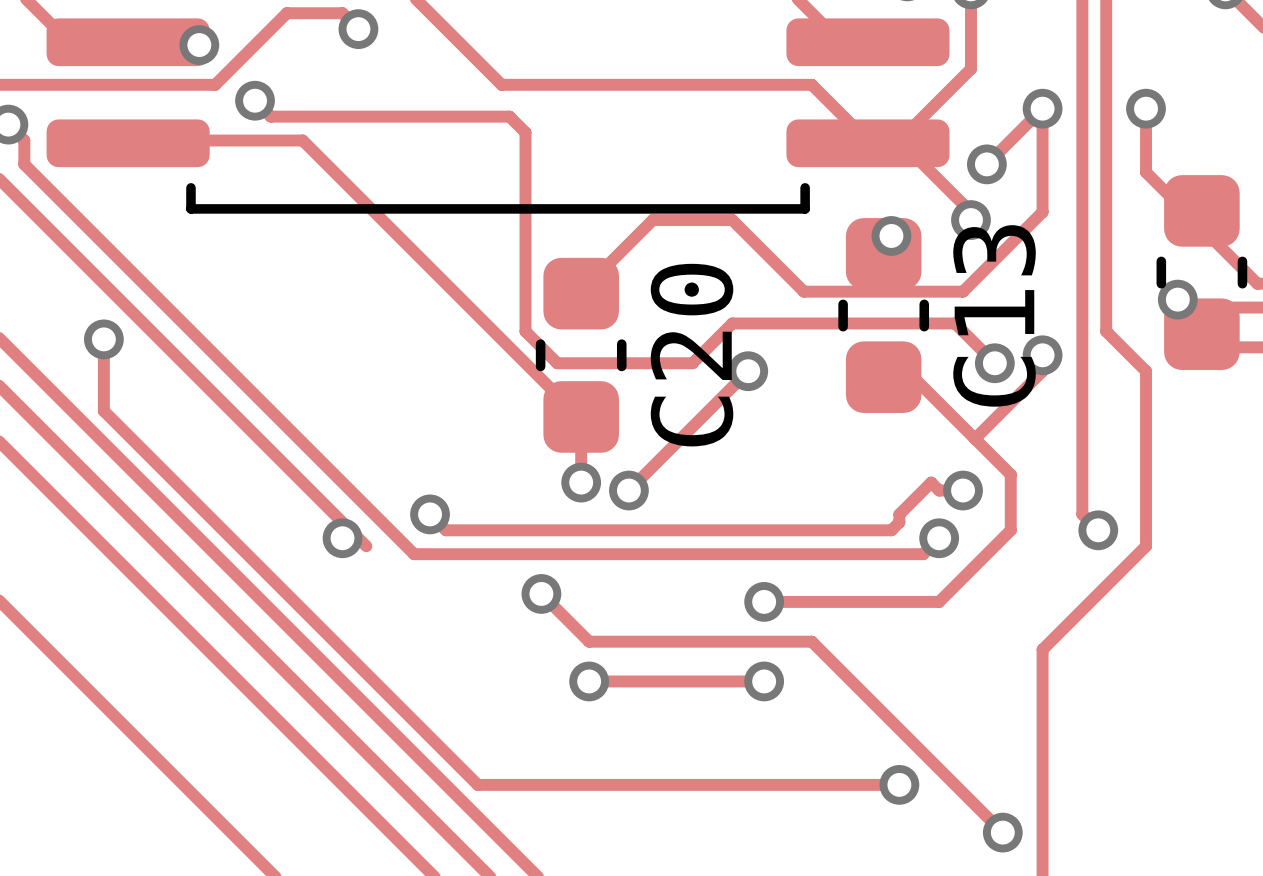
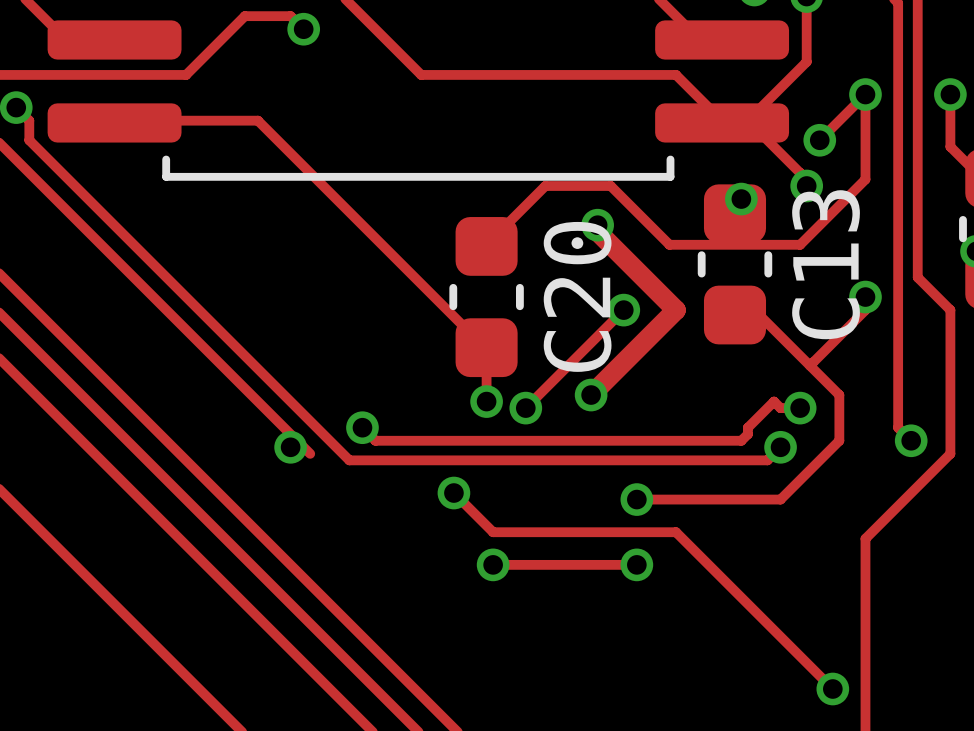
via: (199, 45) -> none
track: (255, 100) (270, 116) (509, 116) (525, 132) (525, 331) (557, 363) (692, 363) (732, 323) (955, 323) (994, 363) -> none
via: (255, 100) -> none
via: none -> (597, 225)
track: none -> (597, 231) (676, 310) (591, 395)
track: (103, 339) (103, 410) (477, 784) (899, 784) -> none
via: (103, 339) -> none
via: (994, 363) -> none
via: none -> (591, 395)
via: (899, 784) -> none

